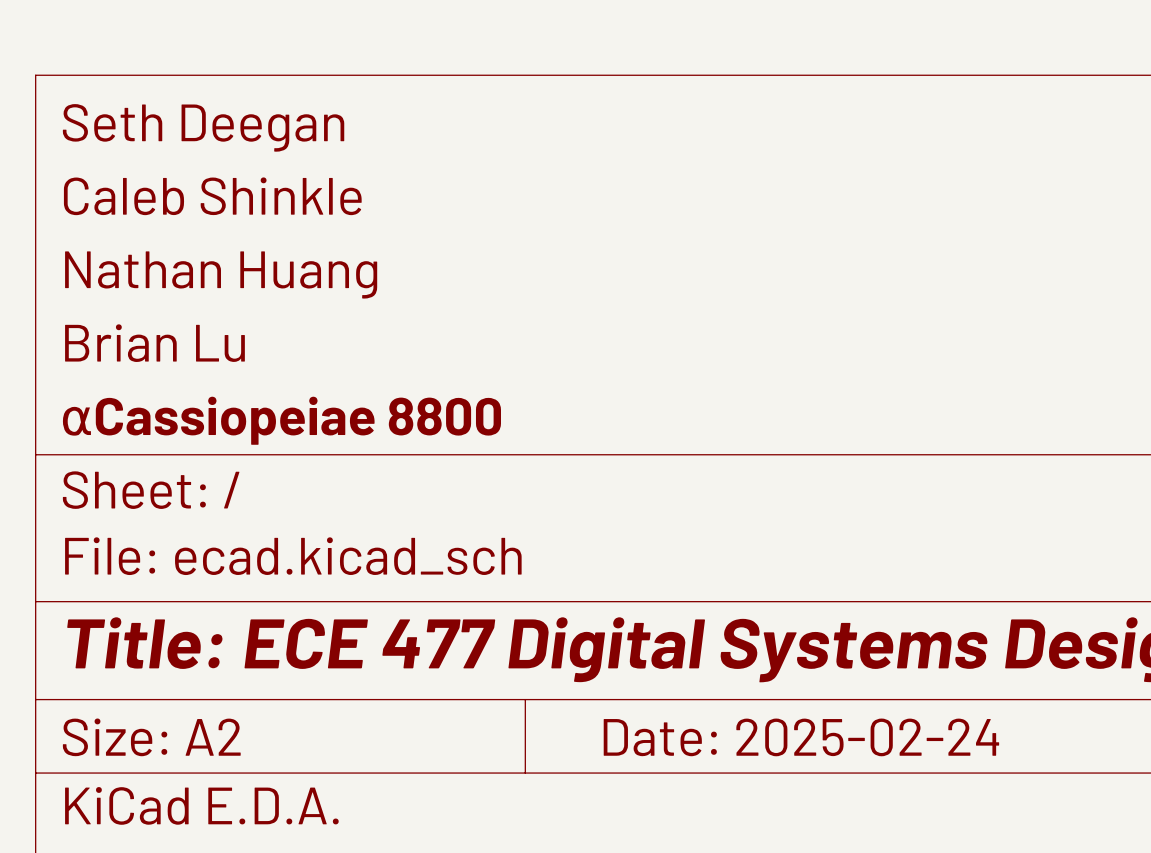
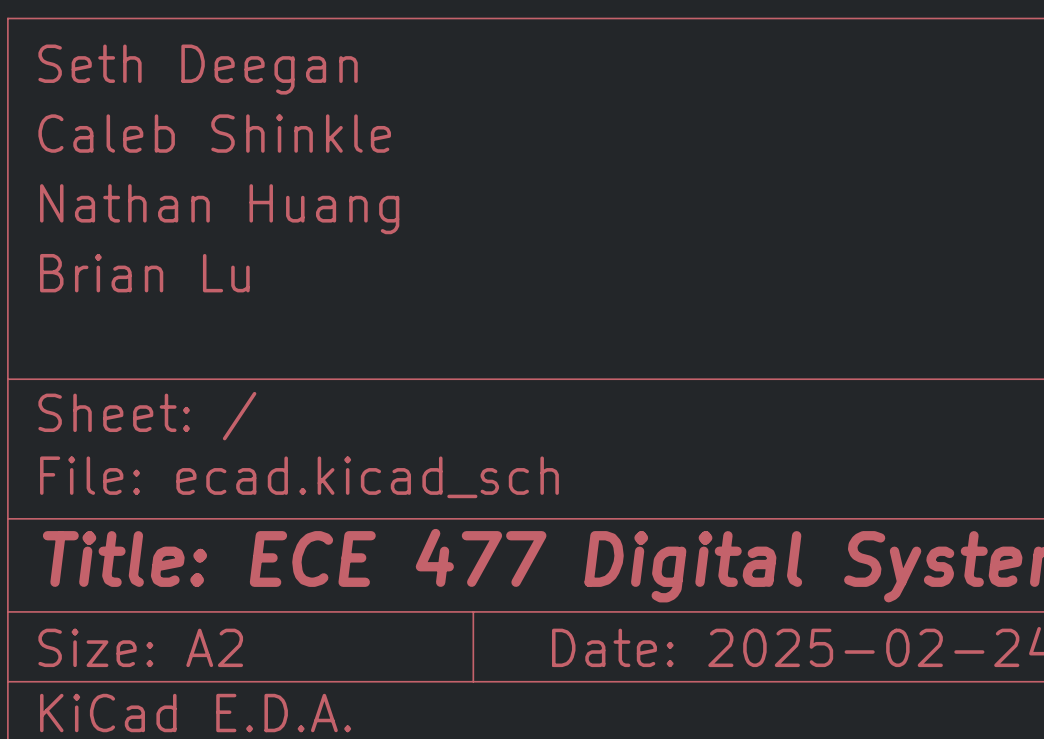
title block: αCassiopeiae 8800 (281, 420) -> none

